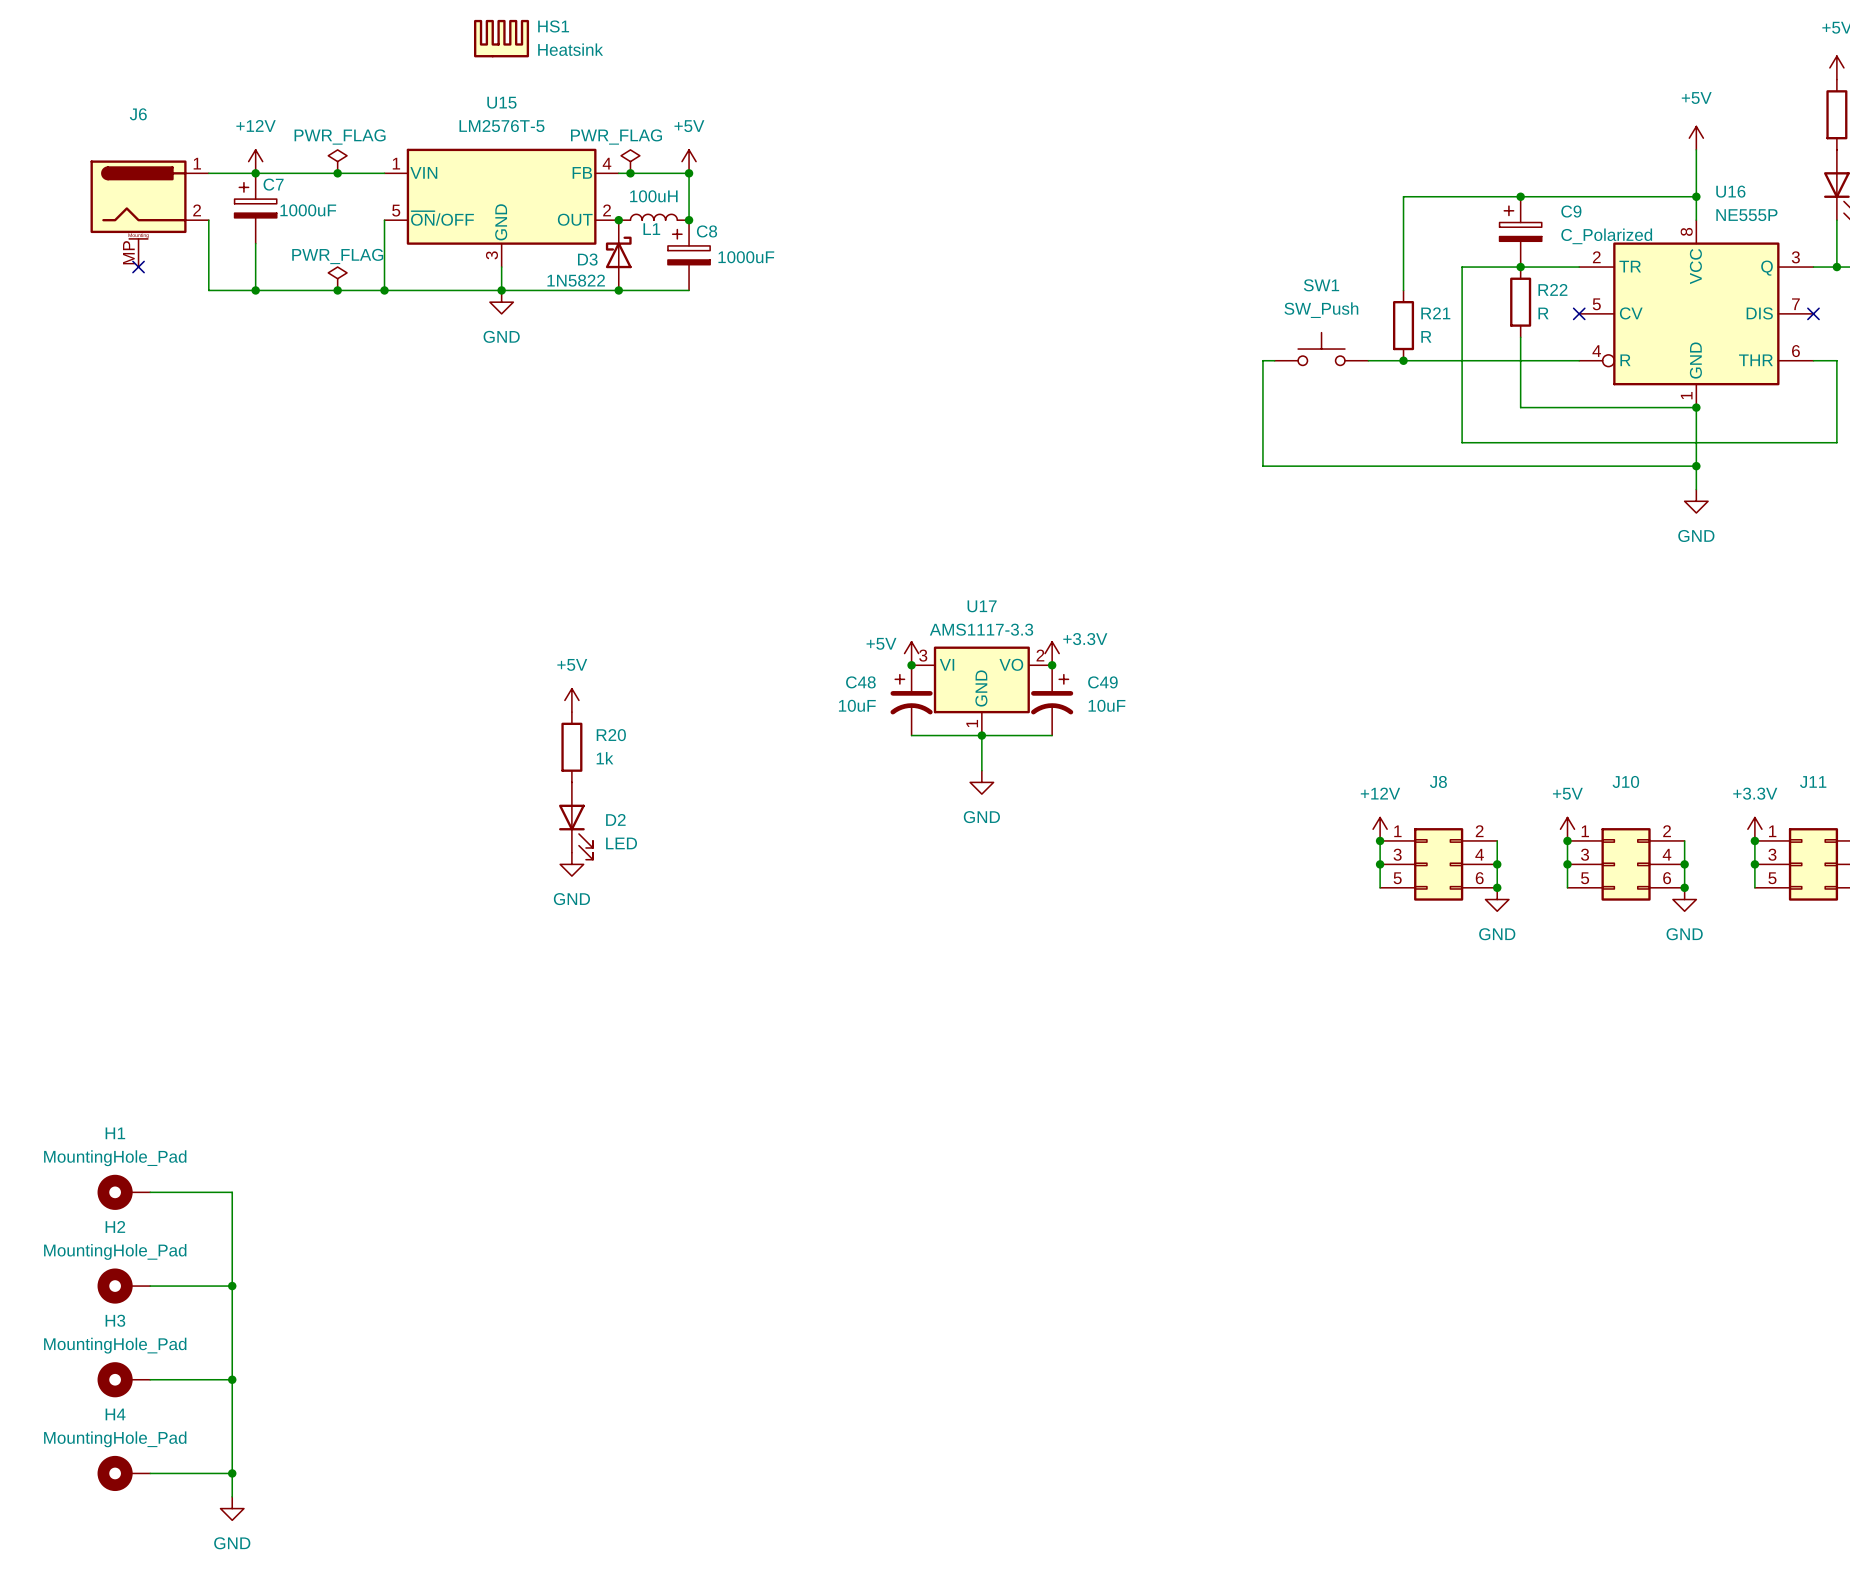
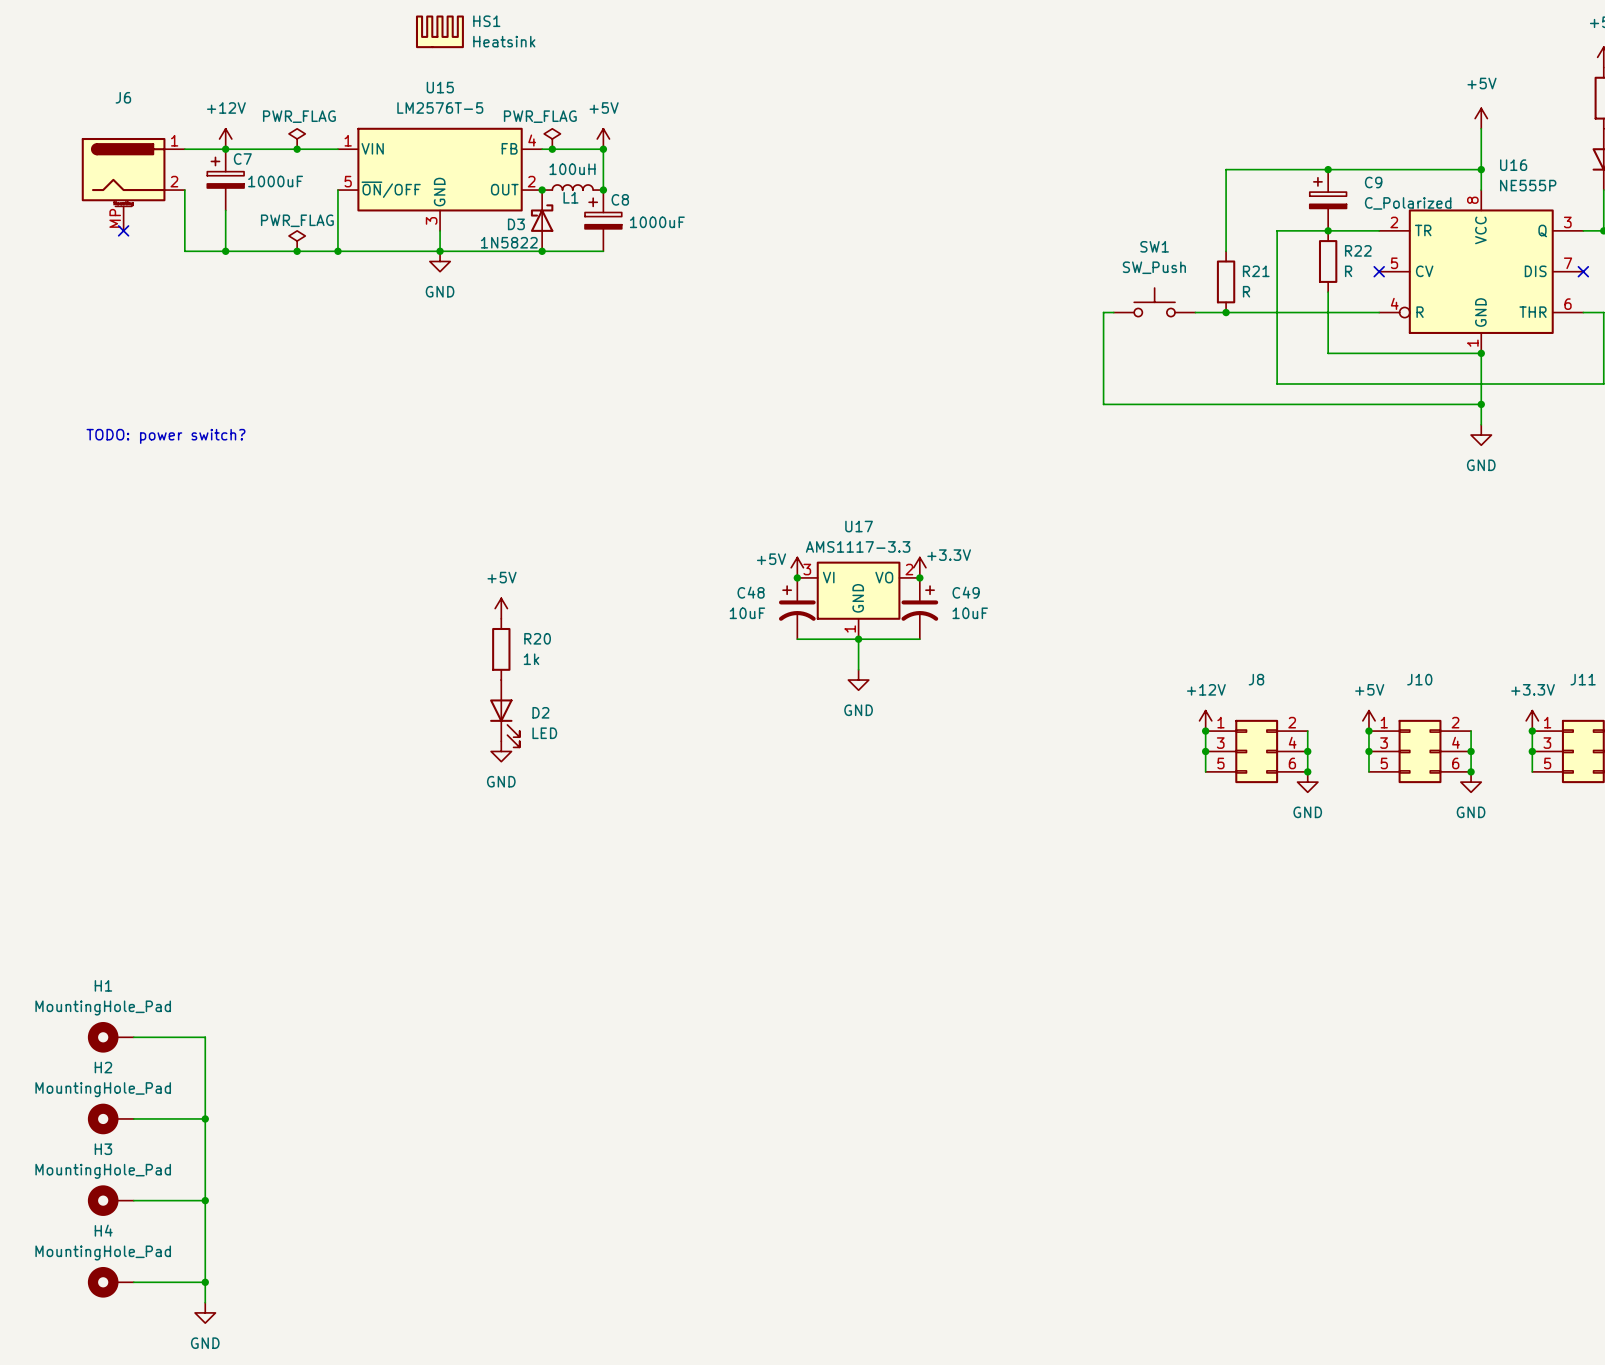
text: none -> TODO: power switch? (165, 436)

